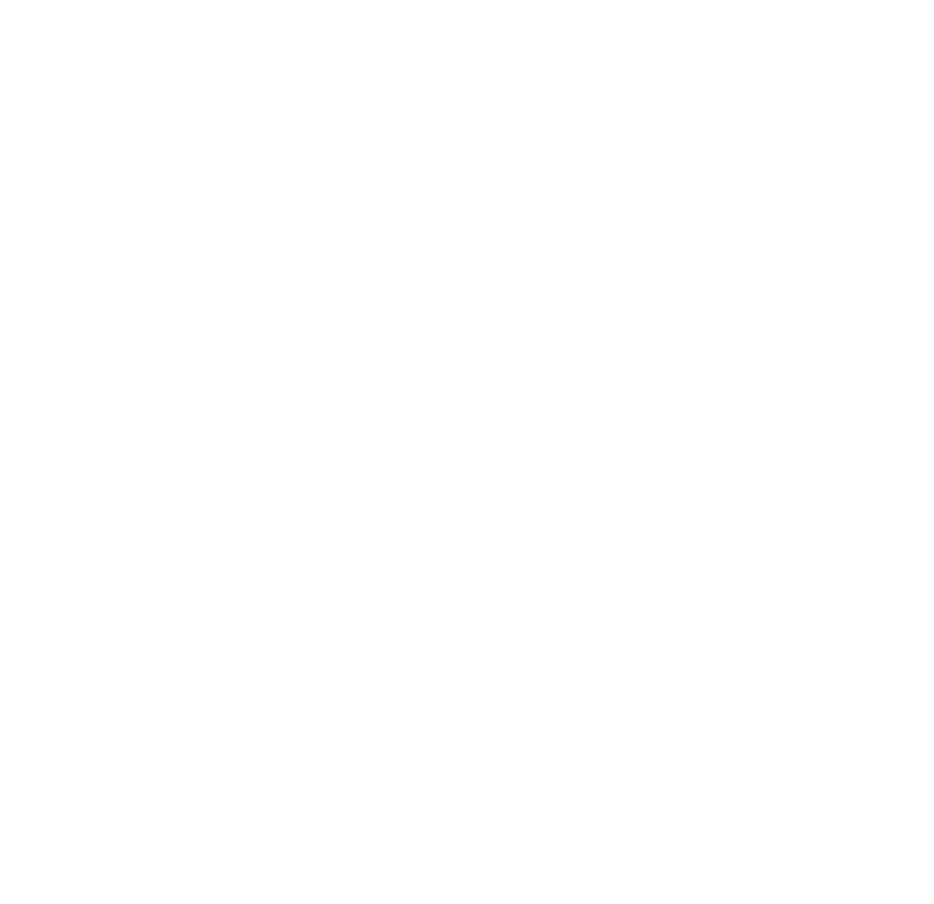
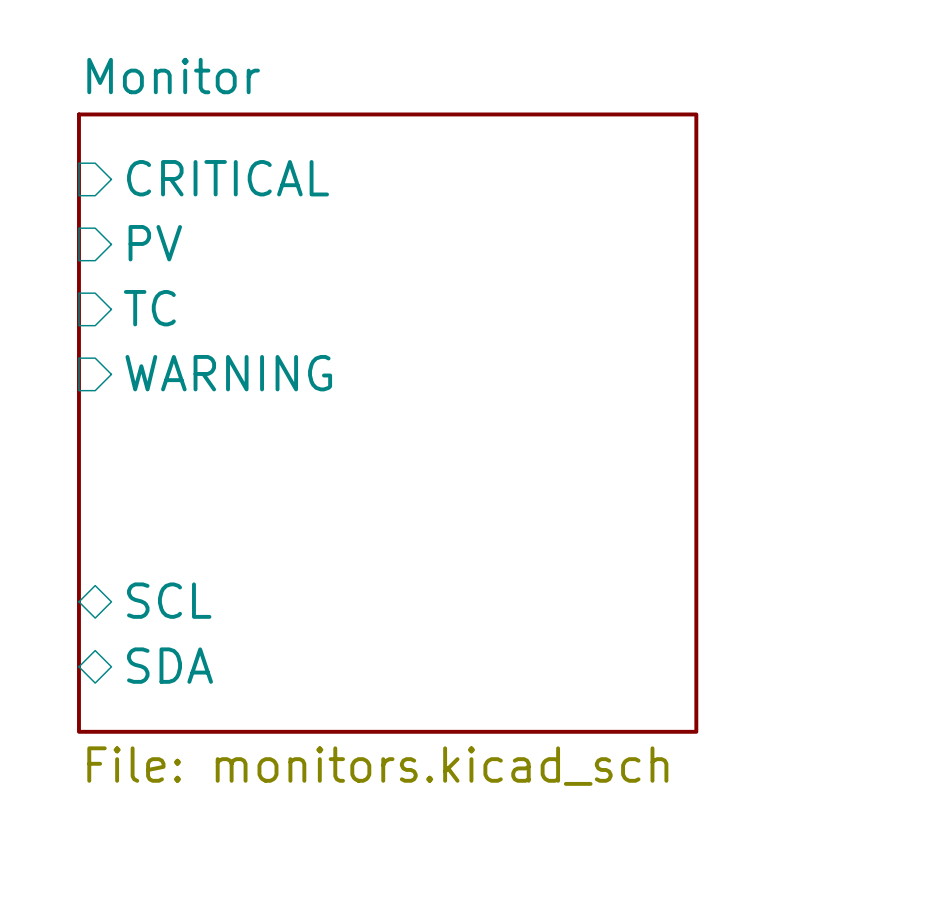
sheet pin: none -> CRITICAL (228, 178)
sheet pin: none -> PV (155, 243)
sheet pin: none -> TC (149, 308)
sheet pin: none -> WARNING (228, 373)
sheet Monitor: none -> File: monitors.kicad_sch (387, 423)
sheet pin: none -> SCL (169, 600)
sheet pin: none -> SDA (169, 665)

